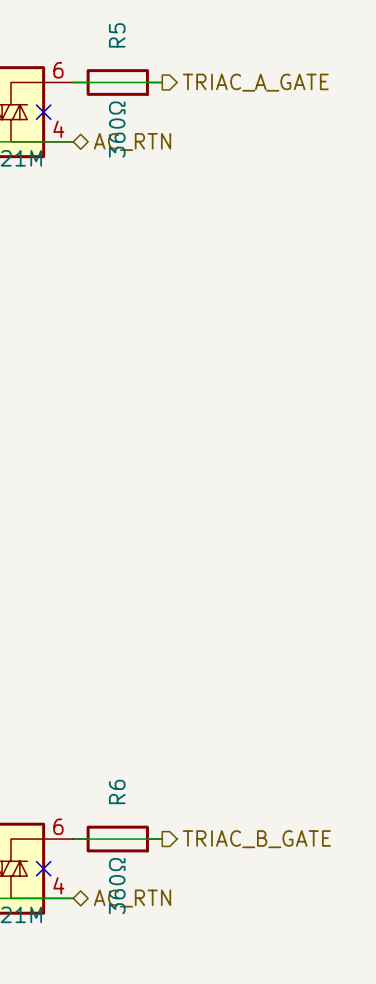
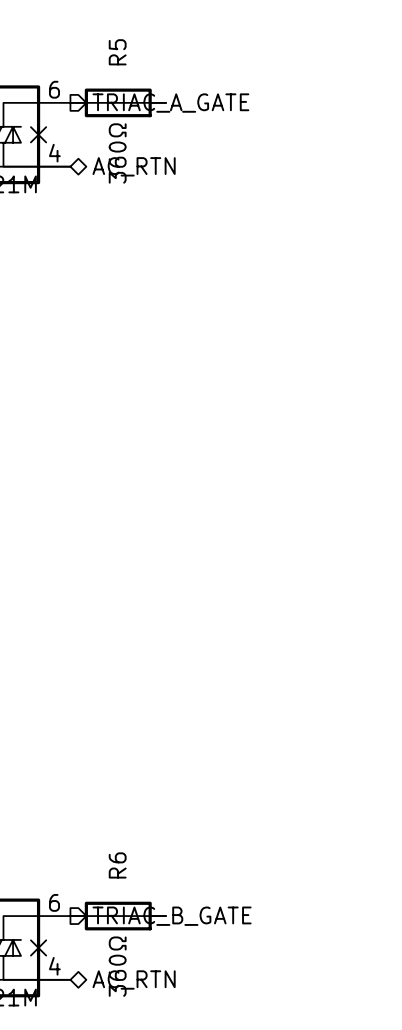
hierarchical label position: TRIAC_A_GATE (255, 82) -> TRIAC_A_GATE (170, 103)
hierarchical label position: TRIAC_B_GATE (256, 839) -> TRIAC_B_GATE (172, 916)

